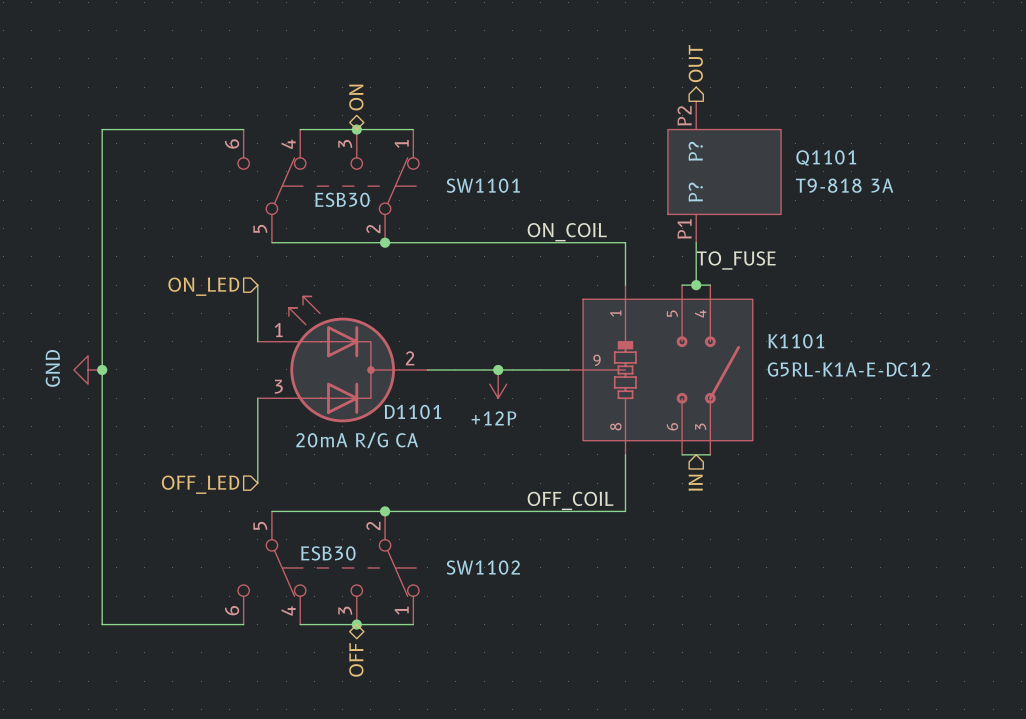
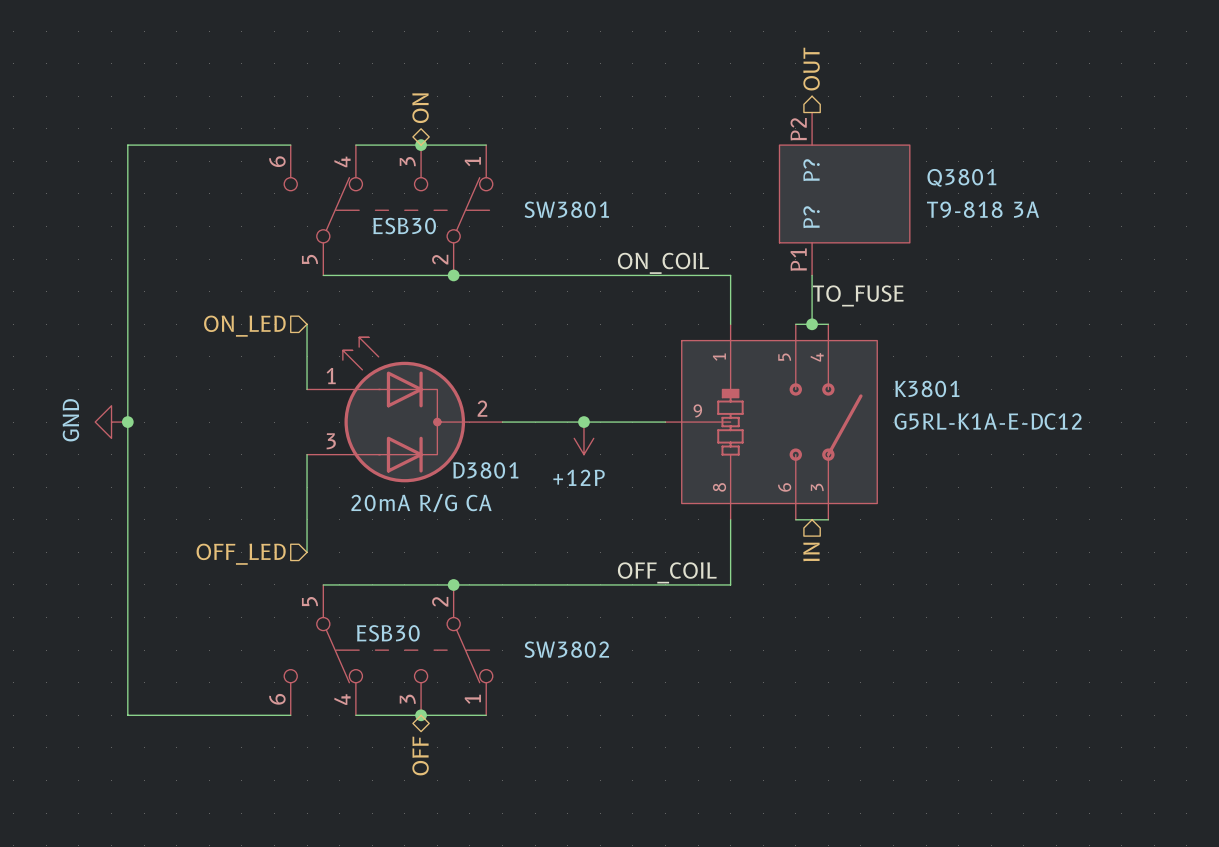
Q1101 name: Q1101 (826, 157) -> Q3801 (961, 177)
SW1101 name: SW1101 (483, 185) -> SW3801 (566, 209)
K1101 name: K1101 (796, 341) -> K3801 (927, 388)
D1101 name: D1101 (412, 411) -> D3801 (485, 470)
SW1102 name: SW1102 (483, 567) -> SW3802 (566, 649)

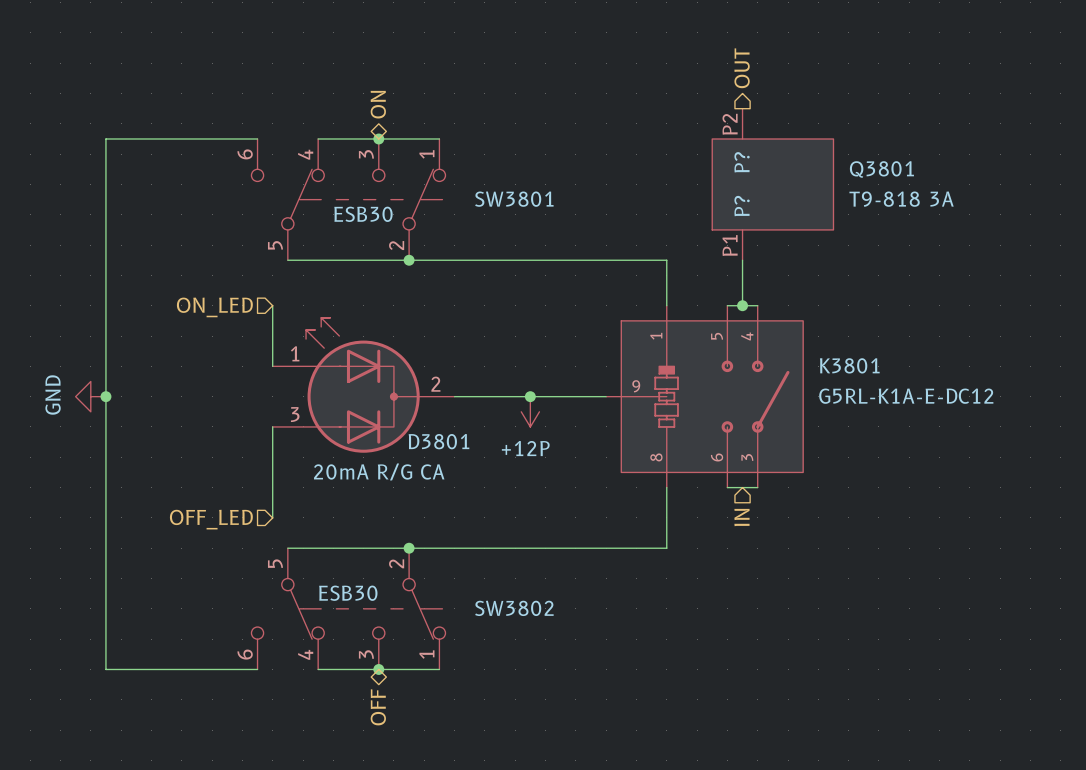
label: ON_COIL (663, 263) -> none
label: TO_FUSE (858, 295) -> none
label: OFF_COIL (667, 572) -> none

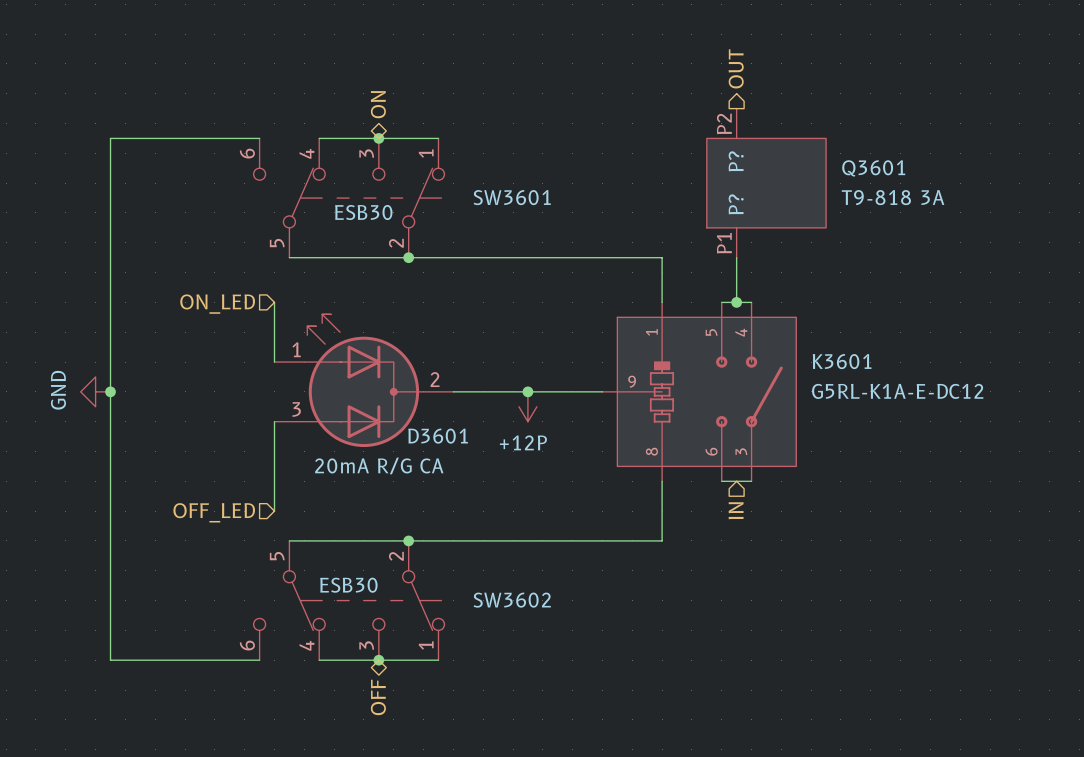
Q3801 name: Q3801 (881, 169) -> Q3601 (873, 168)
SW3801 name: SW3801 (514, 199) -> SW3601 (512, 197)
K3801 name: K3801 (849, 365) -> K3601 (842, 361)
D3801 name: D3801 (439, 441) -> D3601 (438, 436)
SW3802 name: SW3802 (514, 608) -> SW3602 (512, 600)

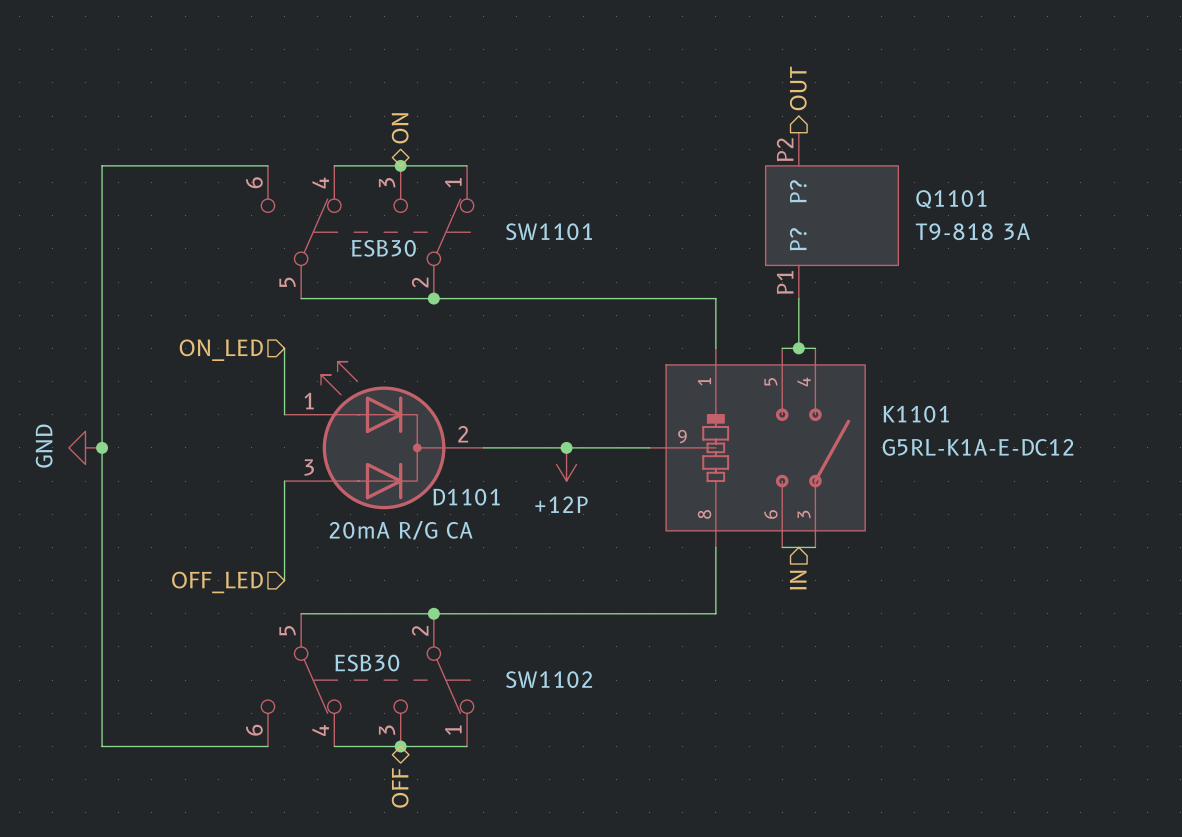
Q3601 name: Q3601 (873, 168) -> Q1101 (951, 199)
SW3601 name: SW3601 (512, 197) -> SW1101 (549, 231)
K3601 name: K3601 (842, 361) -> K1101 (916, 414)
D3601 name: D3601 (438, 436) -> D1101 (466, 497)
SW3602 name: SW3602 (512, 600) -> SW1102 (549, 679)

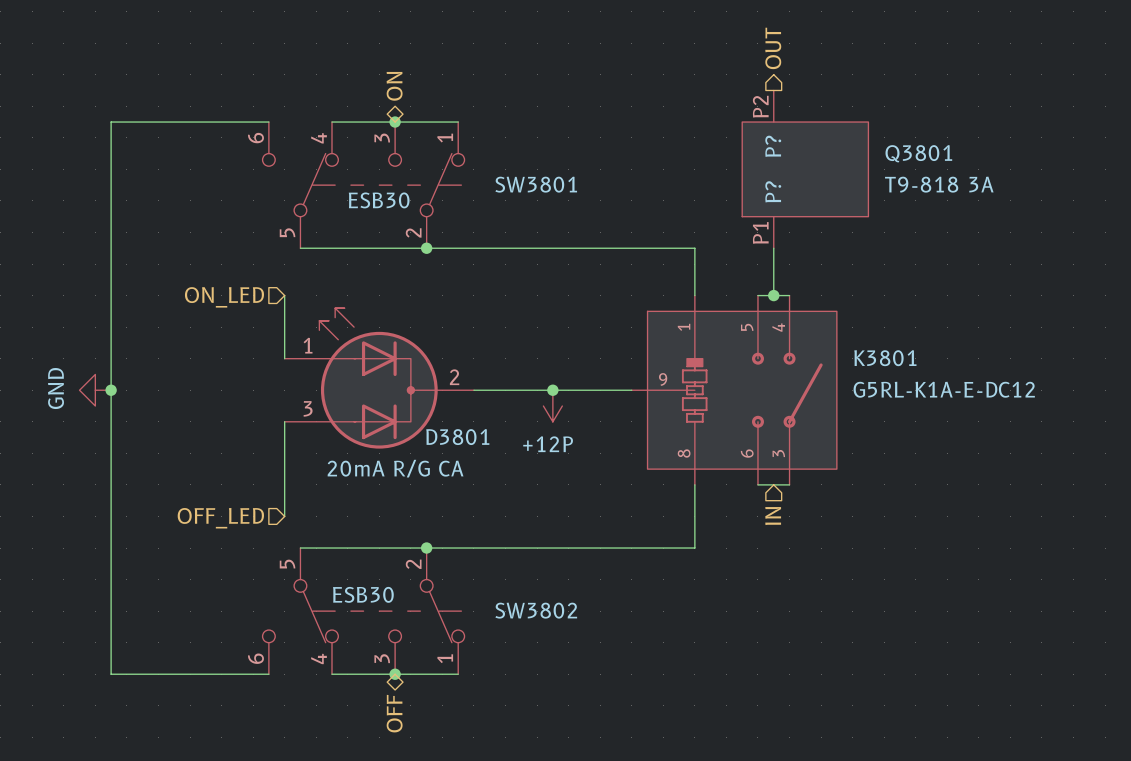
Q1101 name: Q1101 (951, 199) -> Q3801 (918, 153)
SW1101 name: SW1101 (549, 231) -> SW3801 (536, 184)
K1101 name: K1101 (916, 414) -> K3801 (885, 358)
D1101 name: D1101 (466, 497) -> D3801 (457, 437)
SW1102 name: SW1102 (549, 679) -> SW3802 (536, 610)

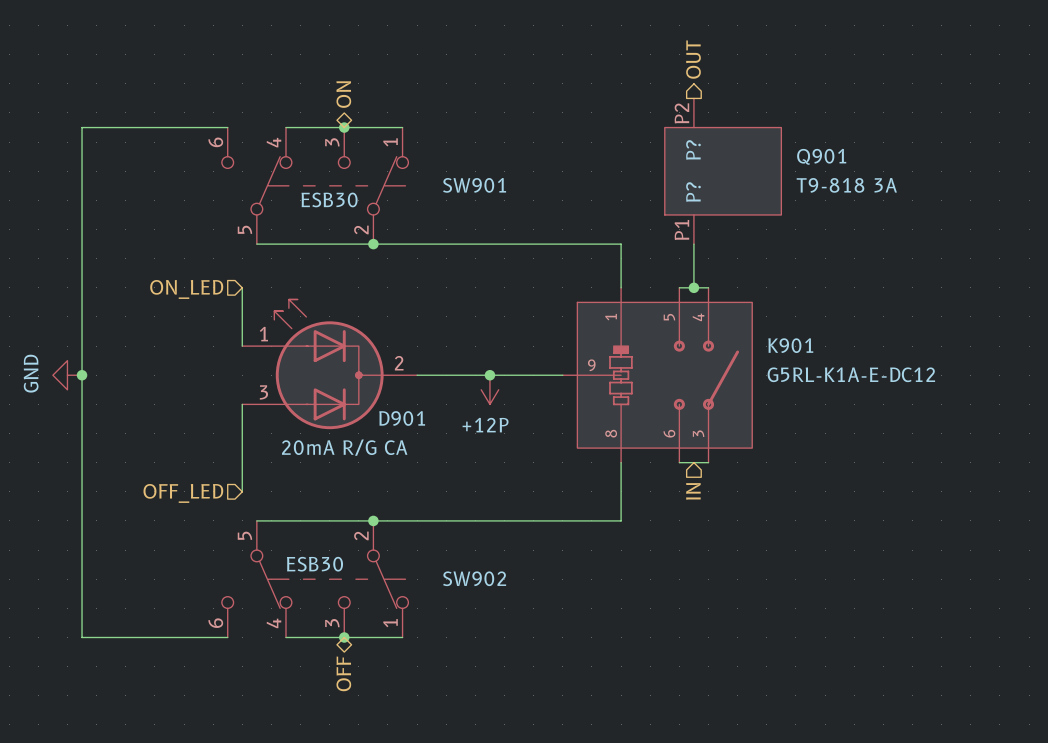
Q3801 name: Q3801 (918, 153) -> Q901 (821, 156)
SW3801 name: SW3801 (536, 184) -> SW901 (474, 185)
K3801 name: K3801 (885, 358) -> K901 (790, 345)
D3801 name: D3801 (457, 437) -> D901 (402, 418)
SW3802 name: SW3802 (536, 610) -> SW902 (474, 578)

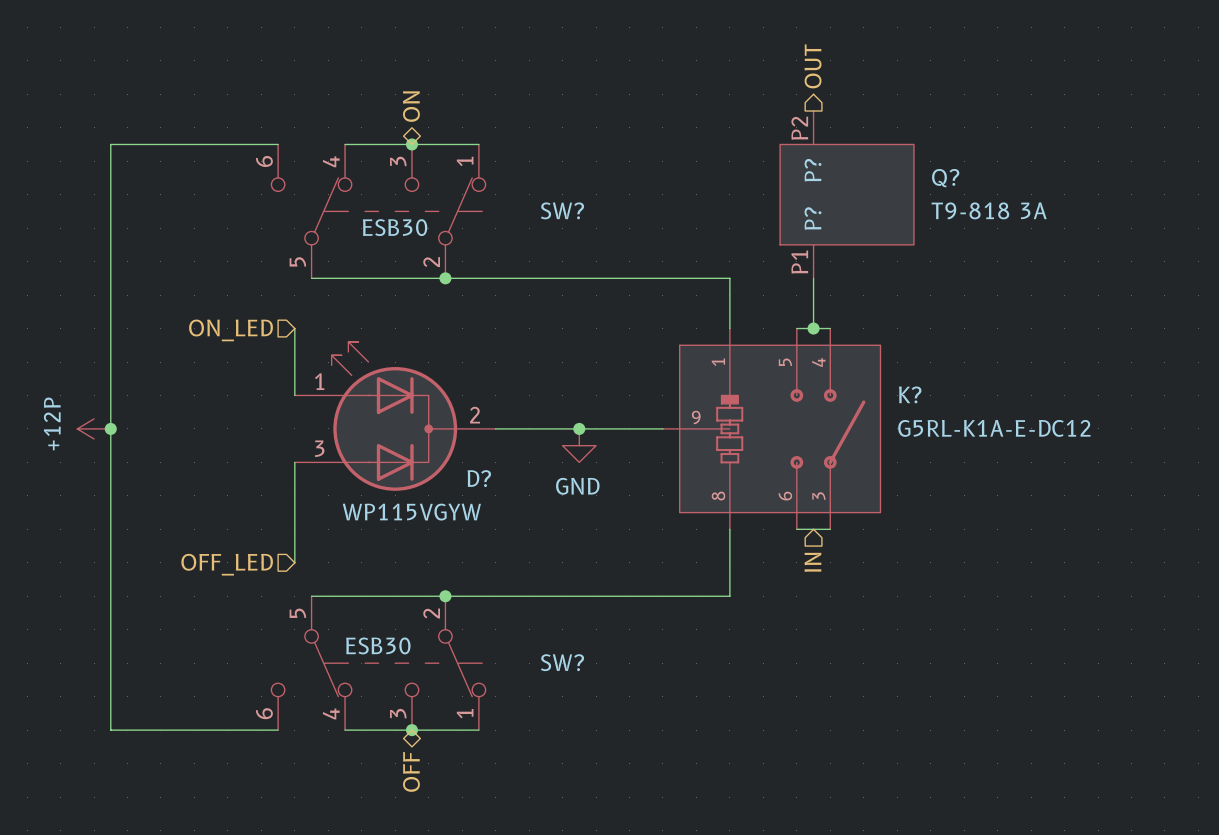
Q901 name: Q901 (821, 156) -> Q? (945, 178)
SW901 name: SW901 (474, 185) -> SW? (562, 210)
K901 name: K901 (790, 345) -> K? (910, 394)
power symbol: GND (67, 375) -> +12P (94, 428)
power symbol: +12P (489, 389) -> GND (579, 445)
D901 name: D901 (402, 418) -> D? (479, 478)
D901 value: 20mA R/G CA (344, 447) -> WP115VGYW (411, 512)
SW902 name: SW902 (474, 578) -> SW? (562, 662)

